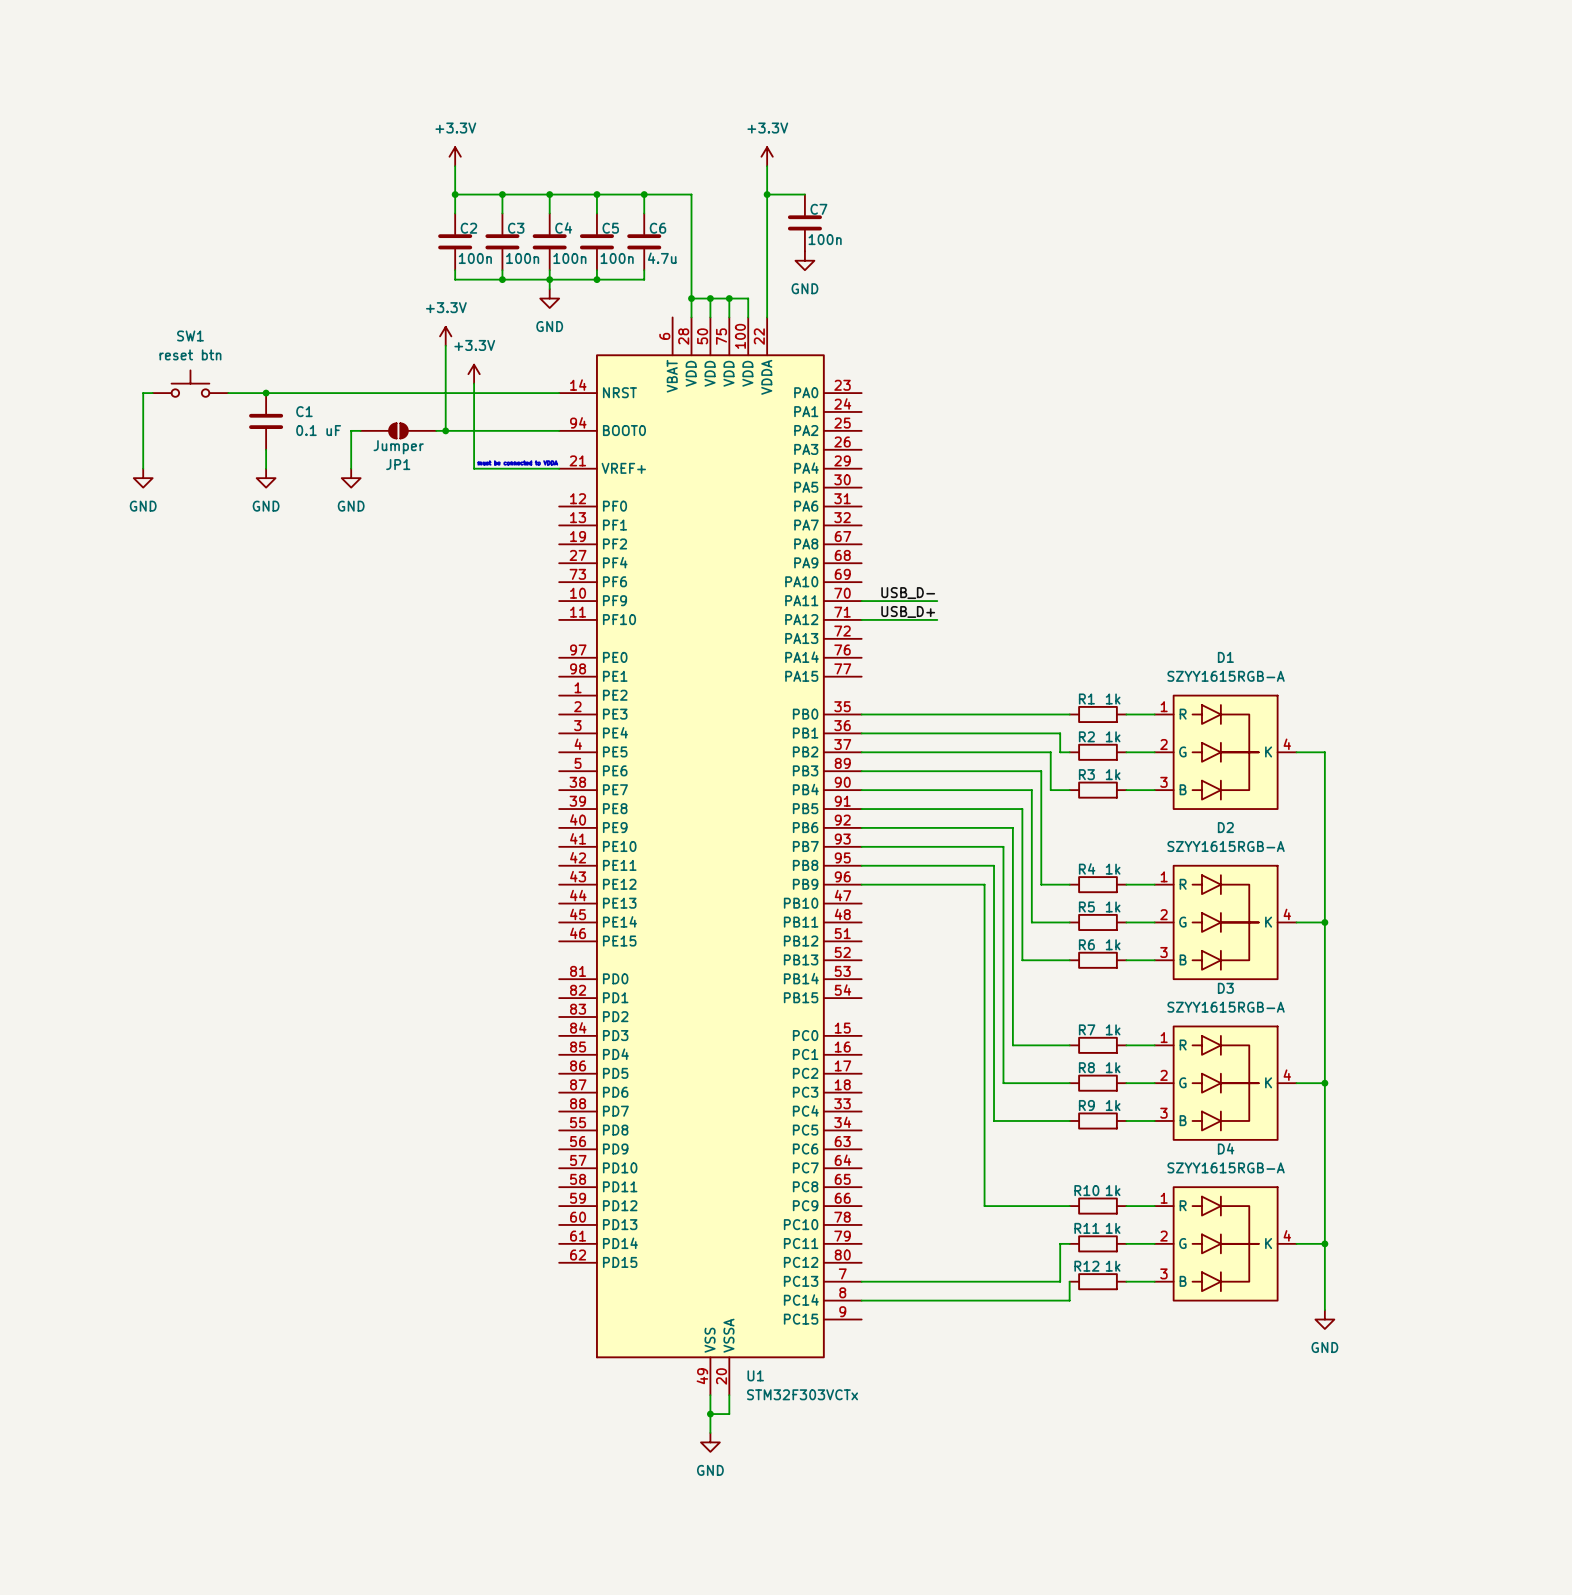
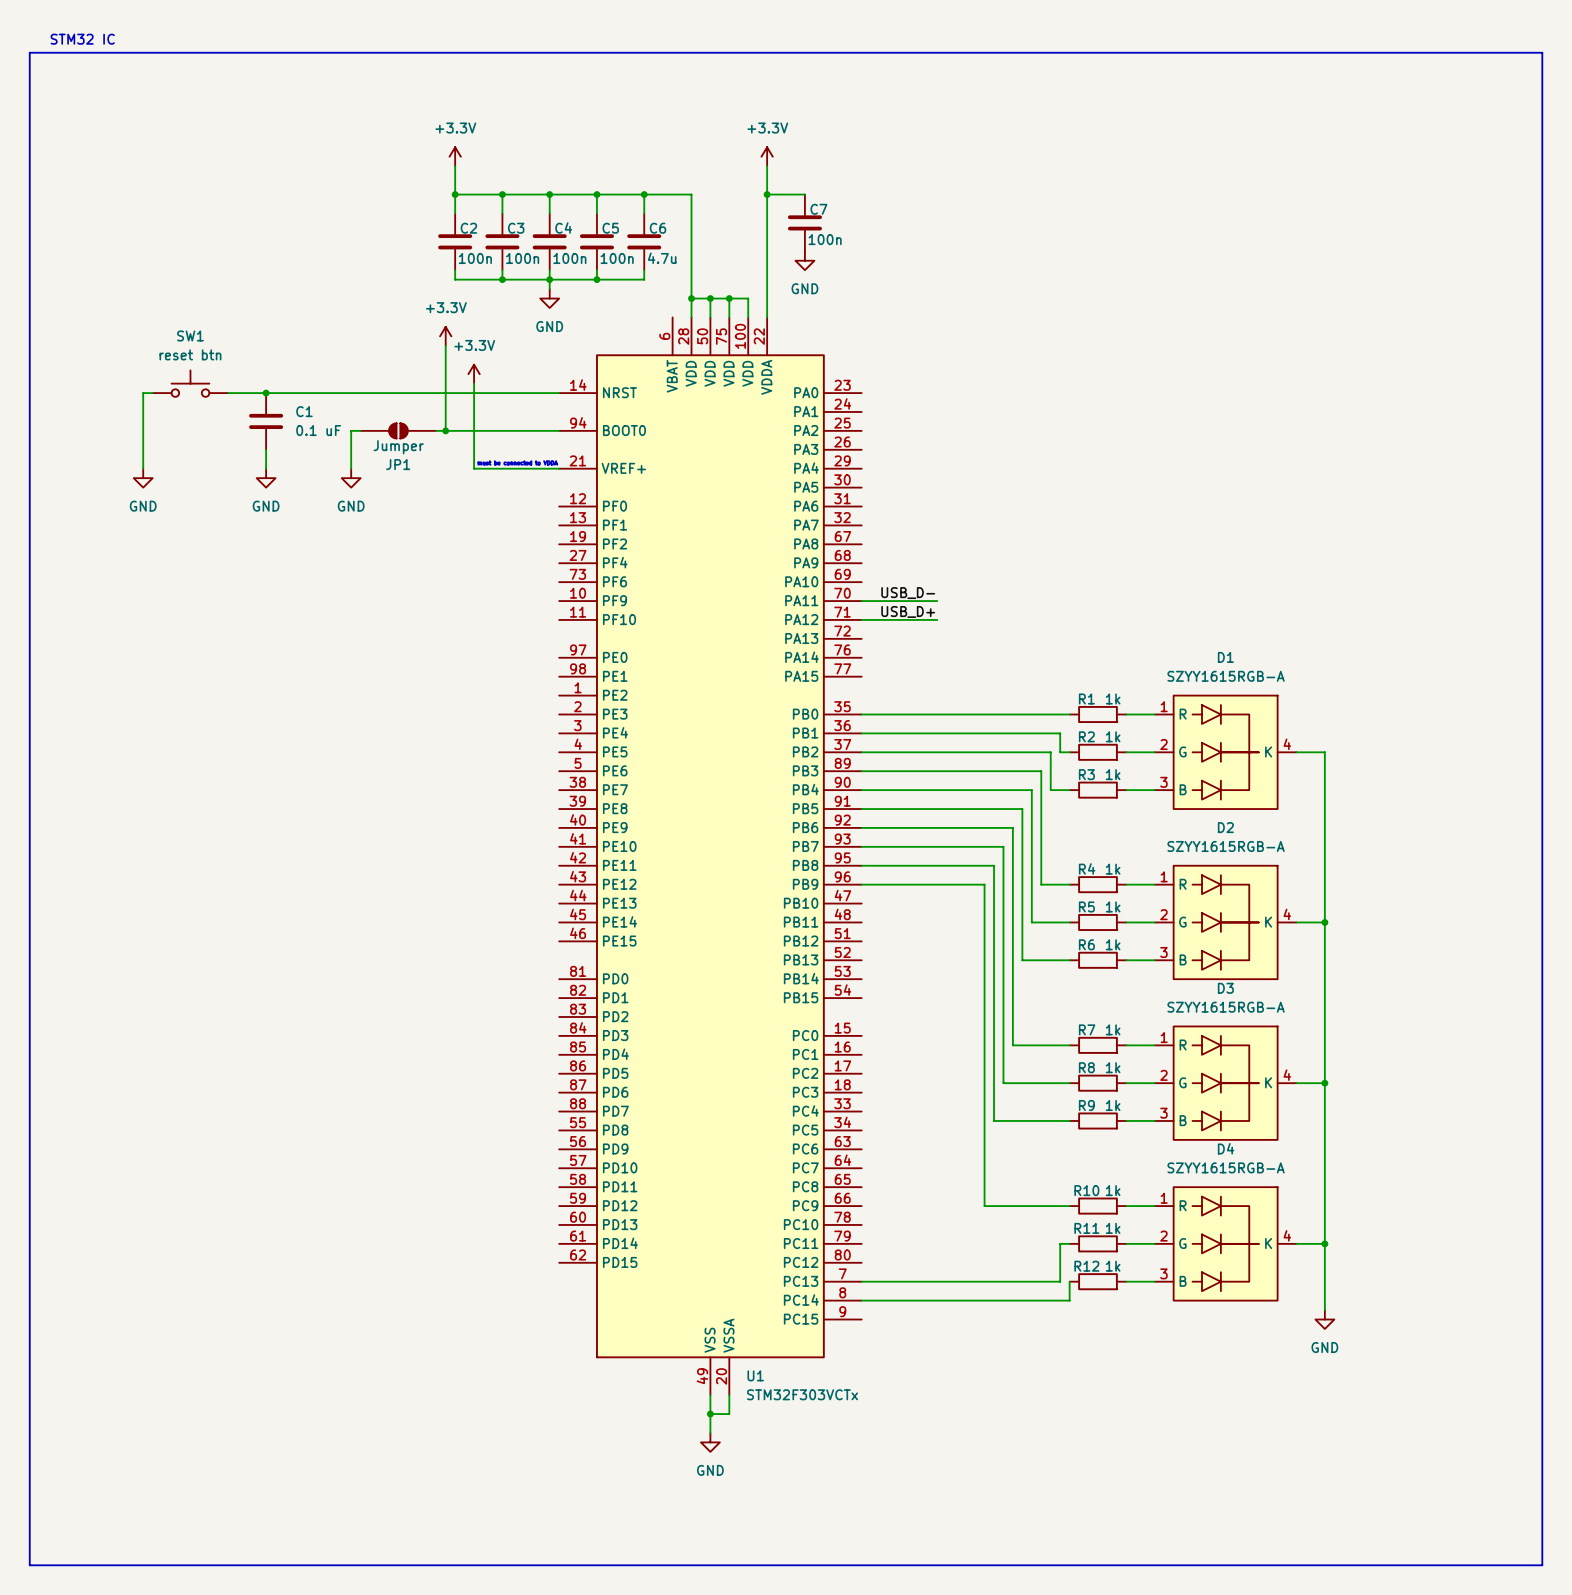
text: none -> STM32 IC (82, 39)
line: none -> (29, 52) (1542, 52) (1542, 1565) (29, 1565) (29, 52)

